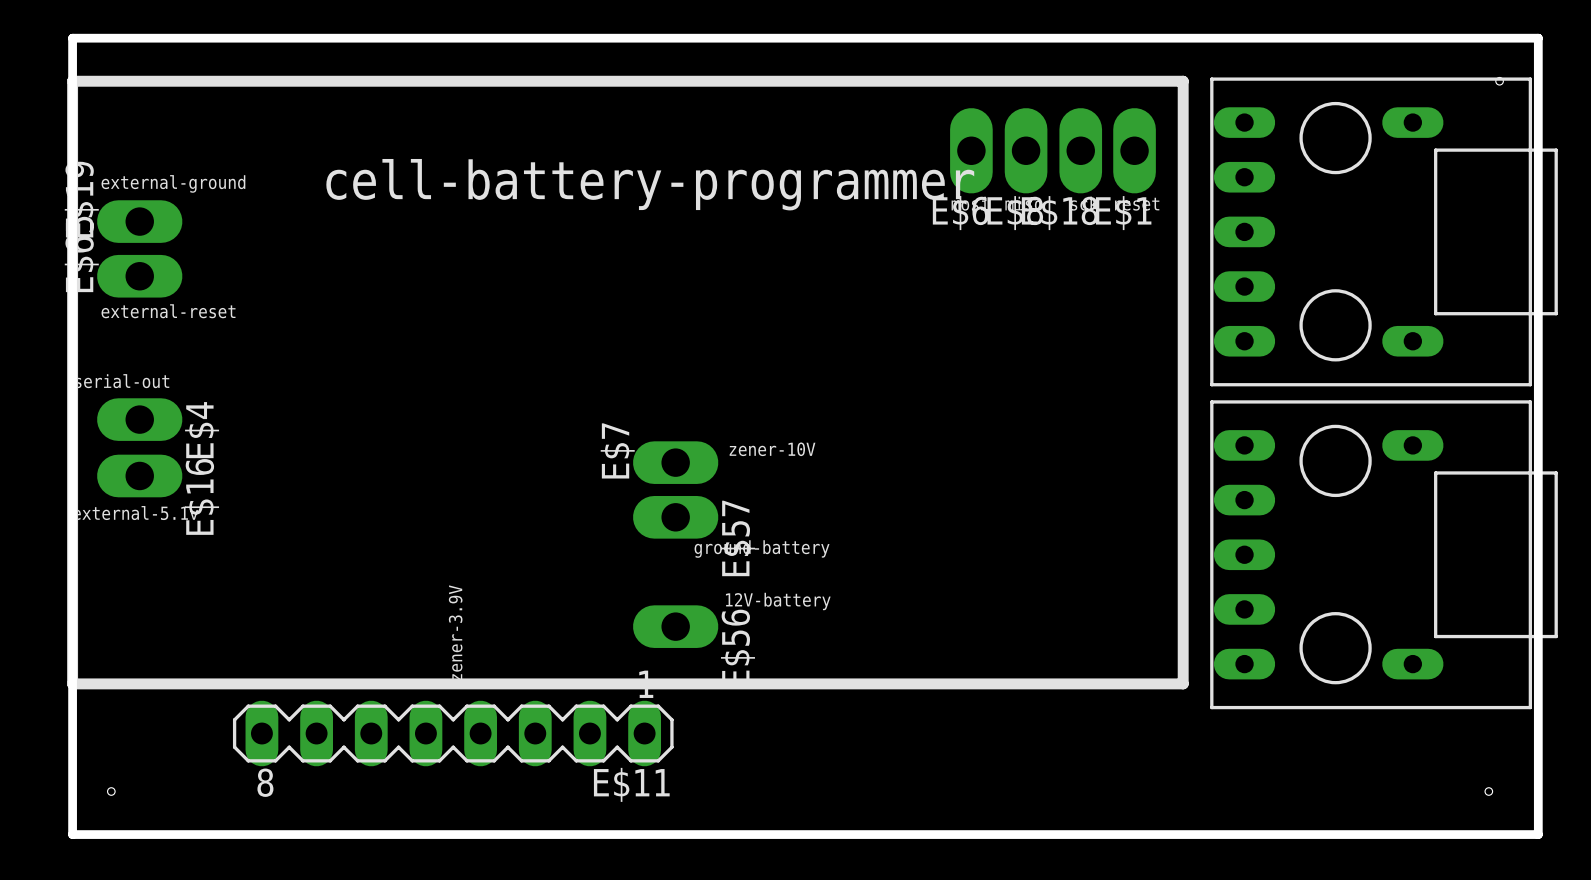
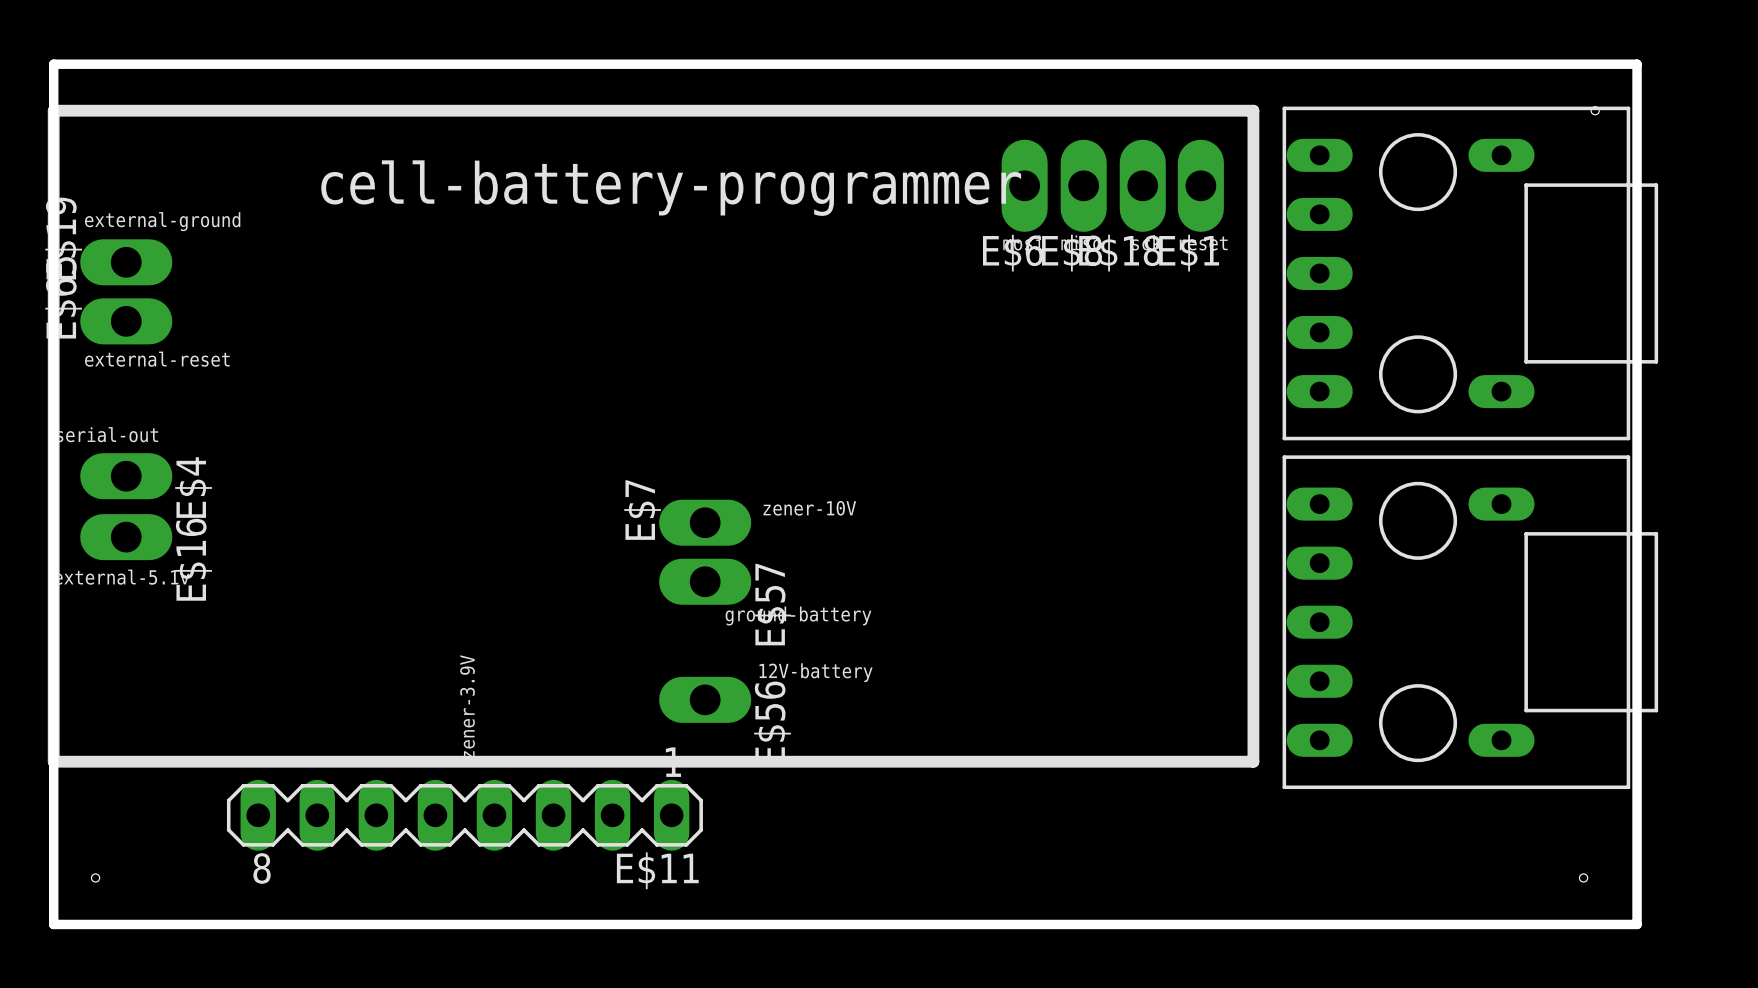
text position: cell-battery-programmer (650, 184) -> cell-battery-programmer (671, 188)

